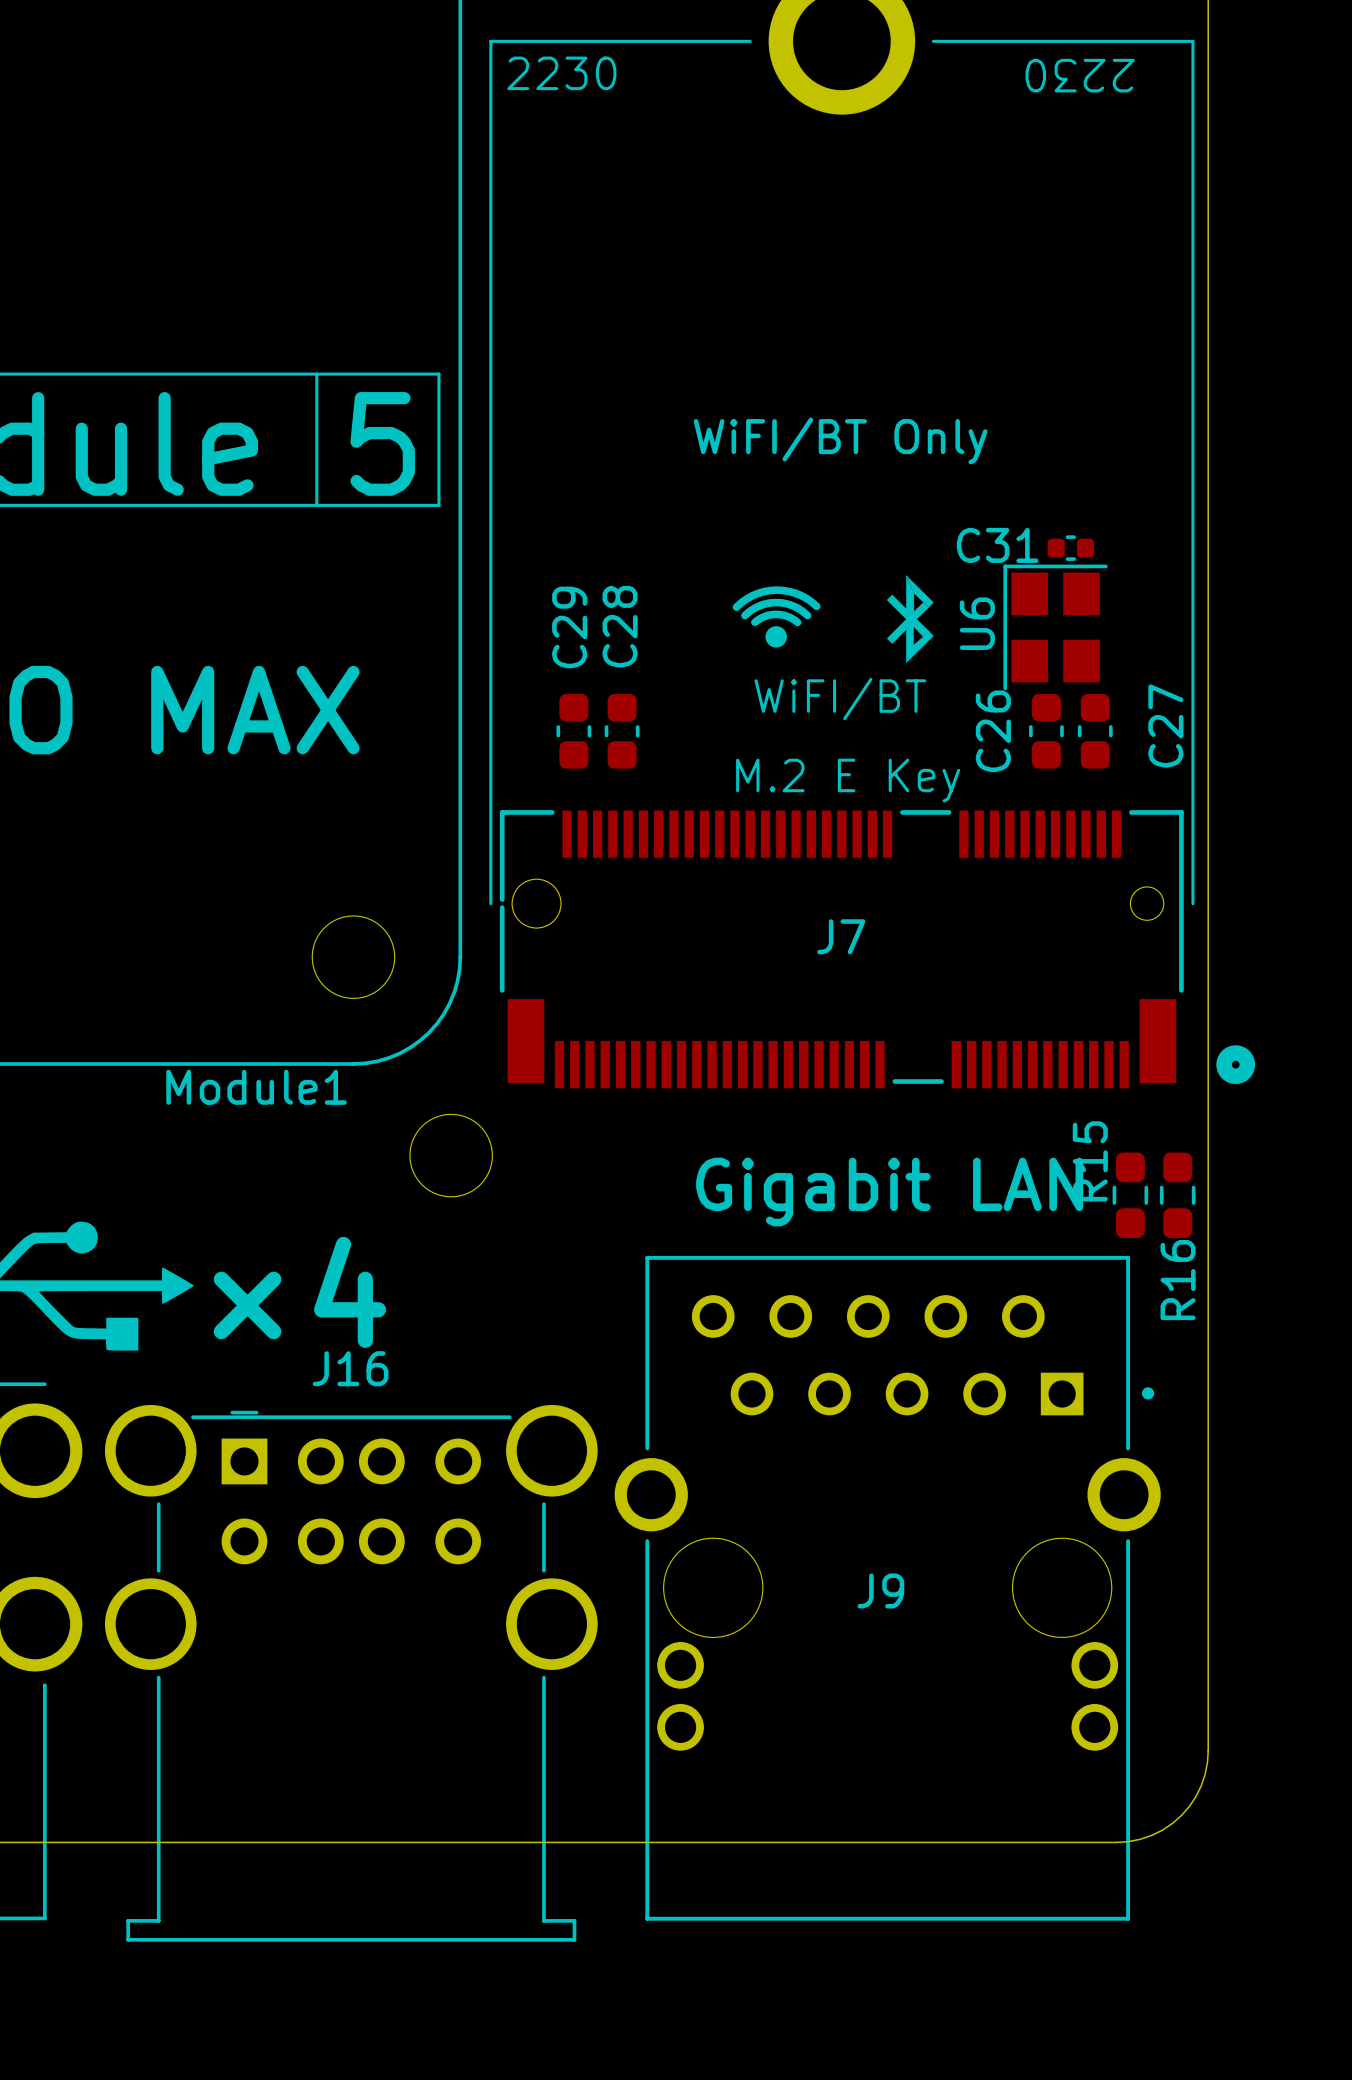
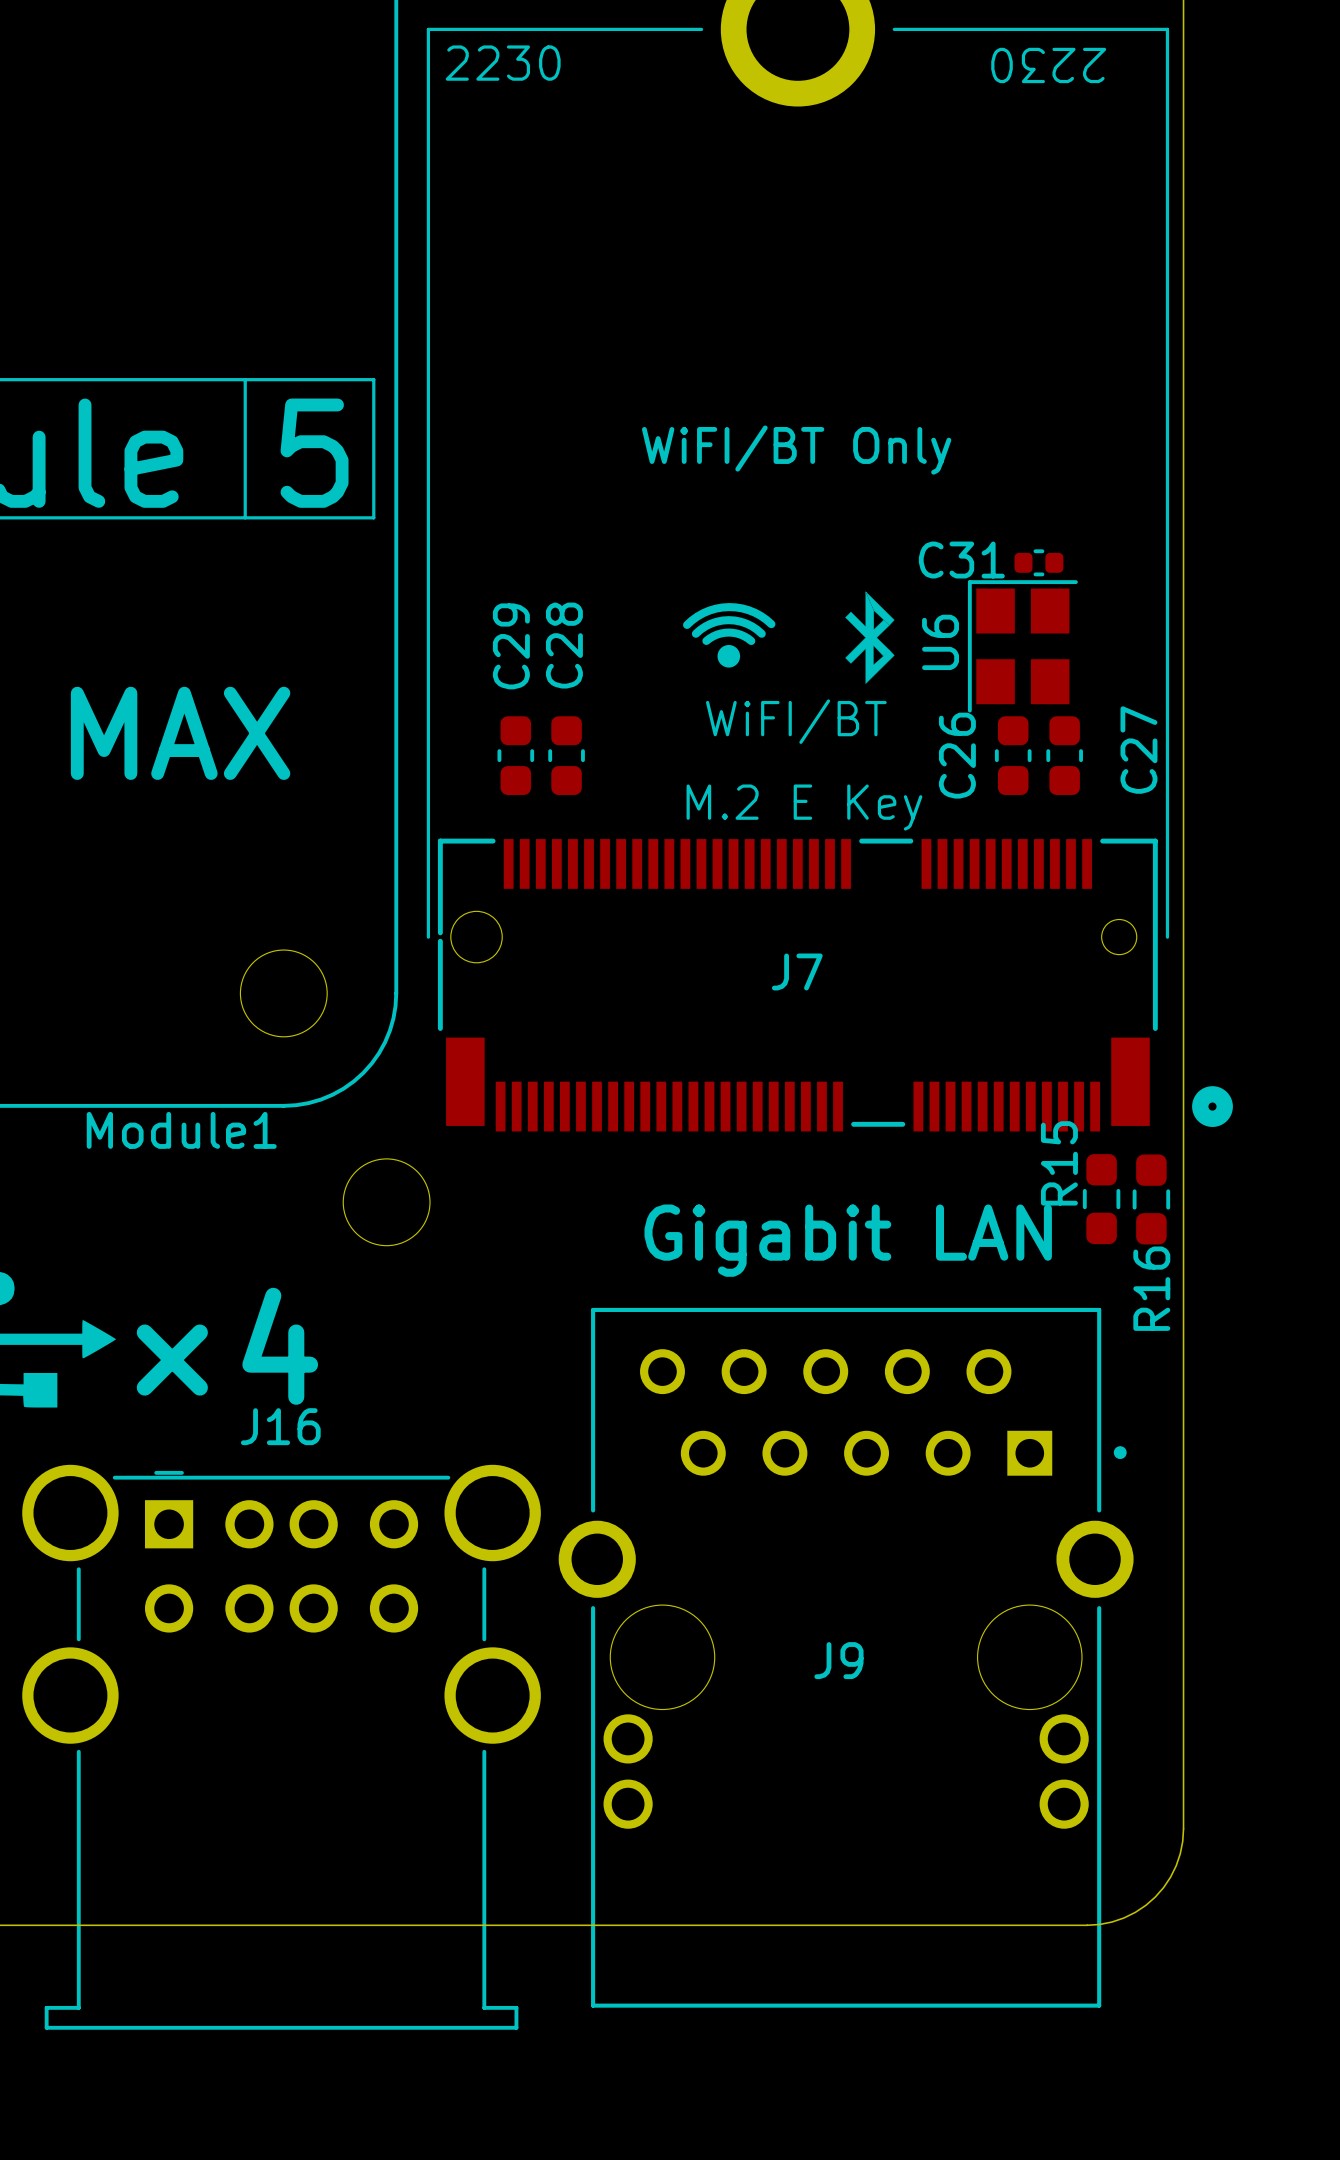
R15 position: (1130, 1195) -> (1101, 1199)
R16 position: (1177, 1195) -> (1151, 1199)

